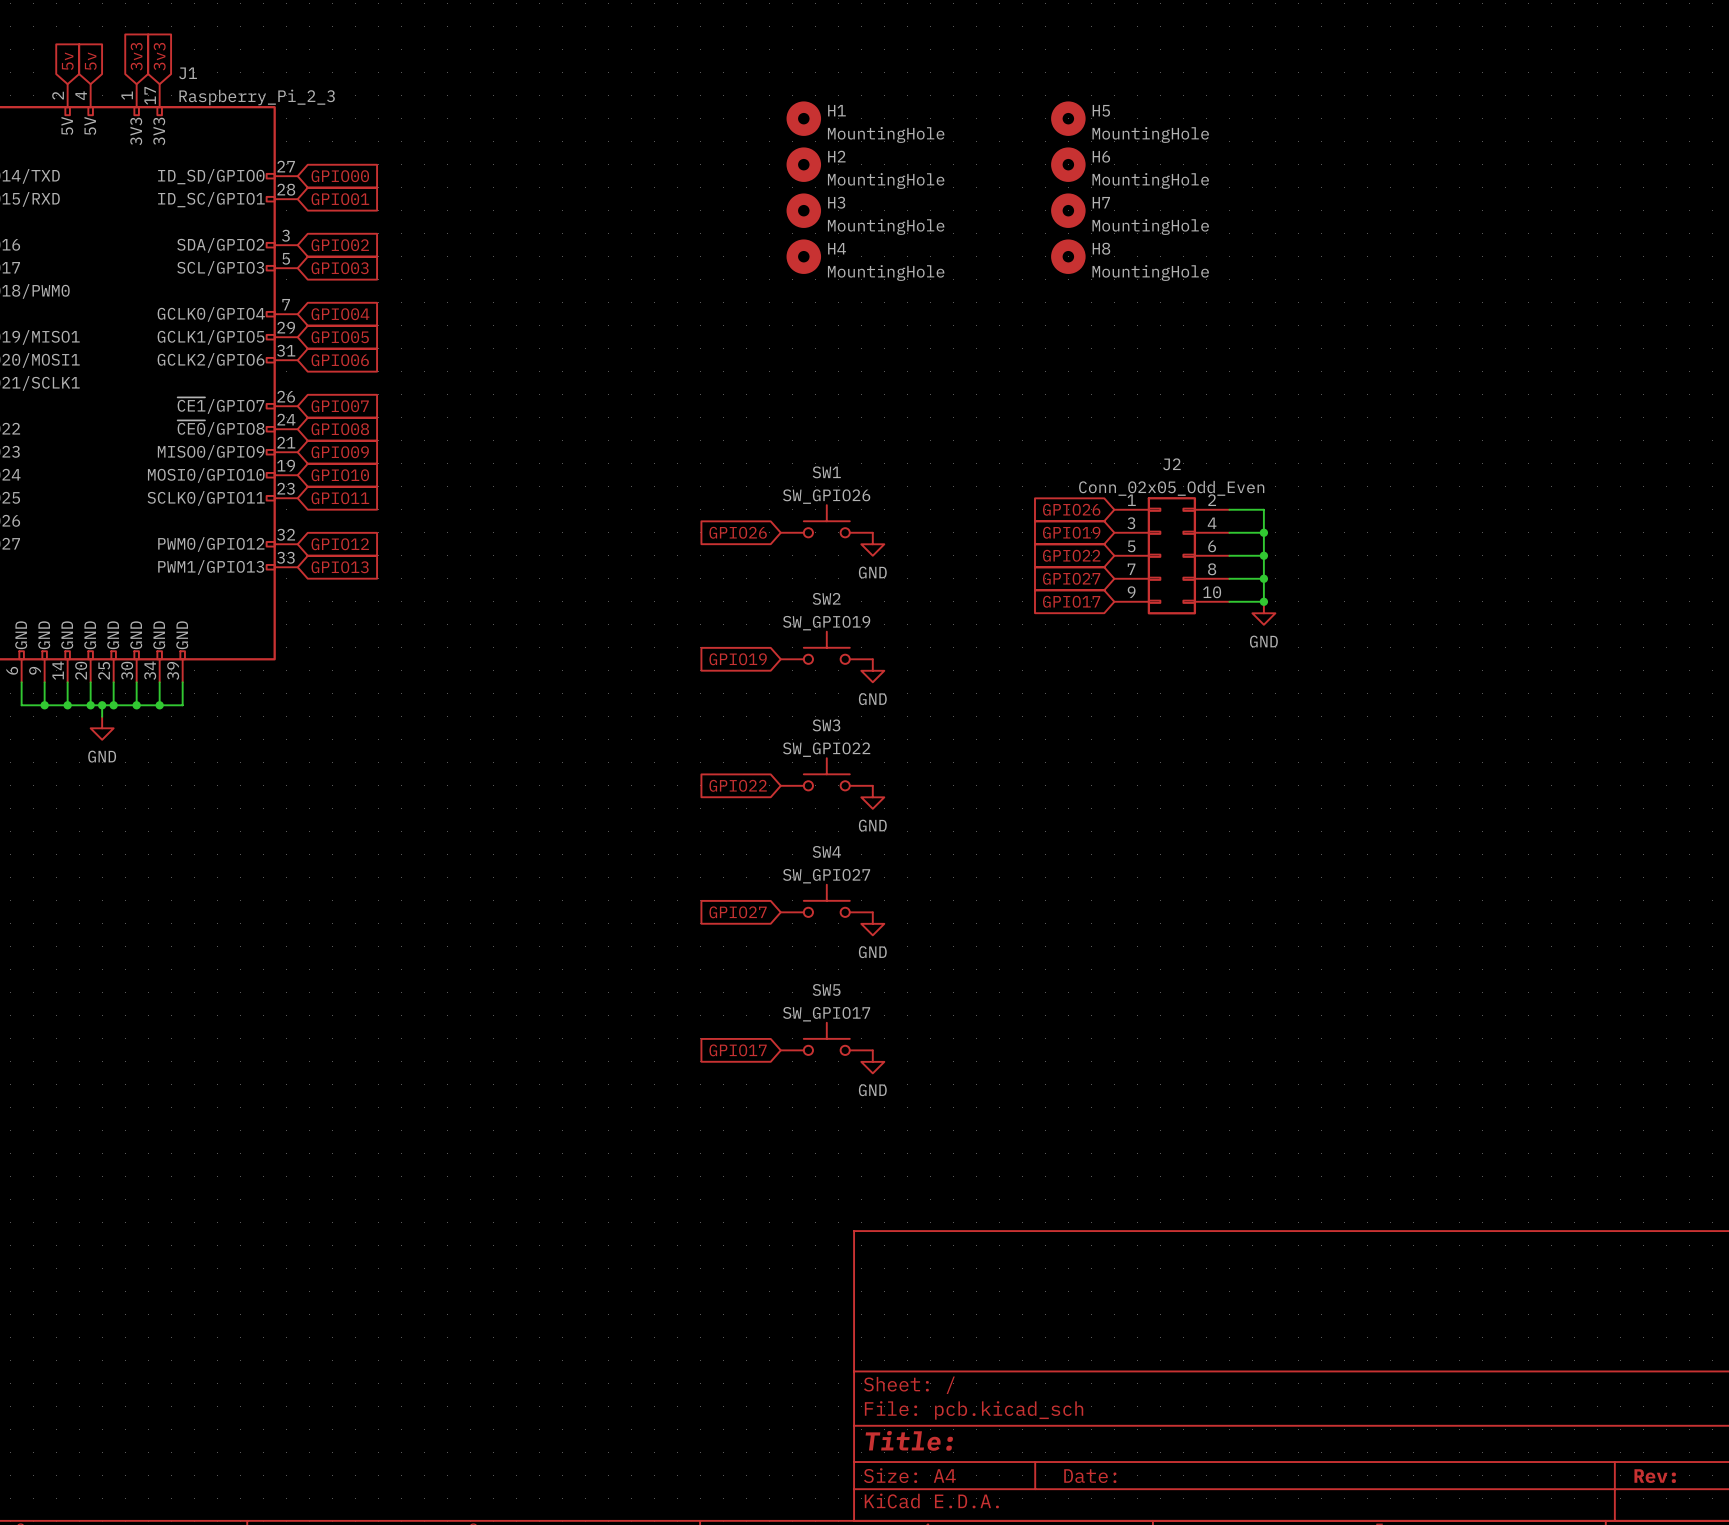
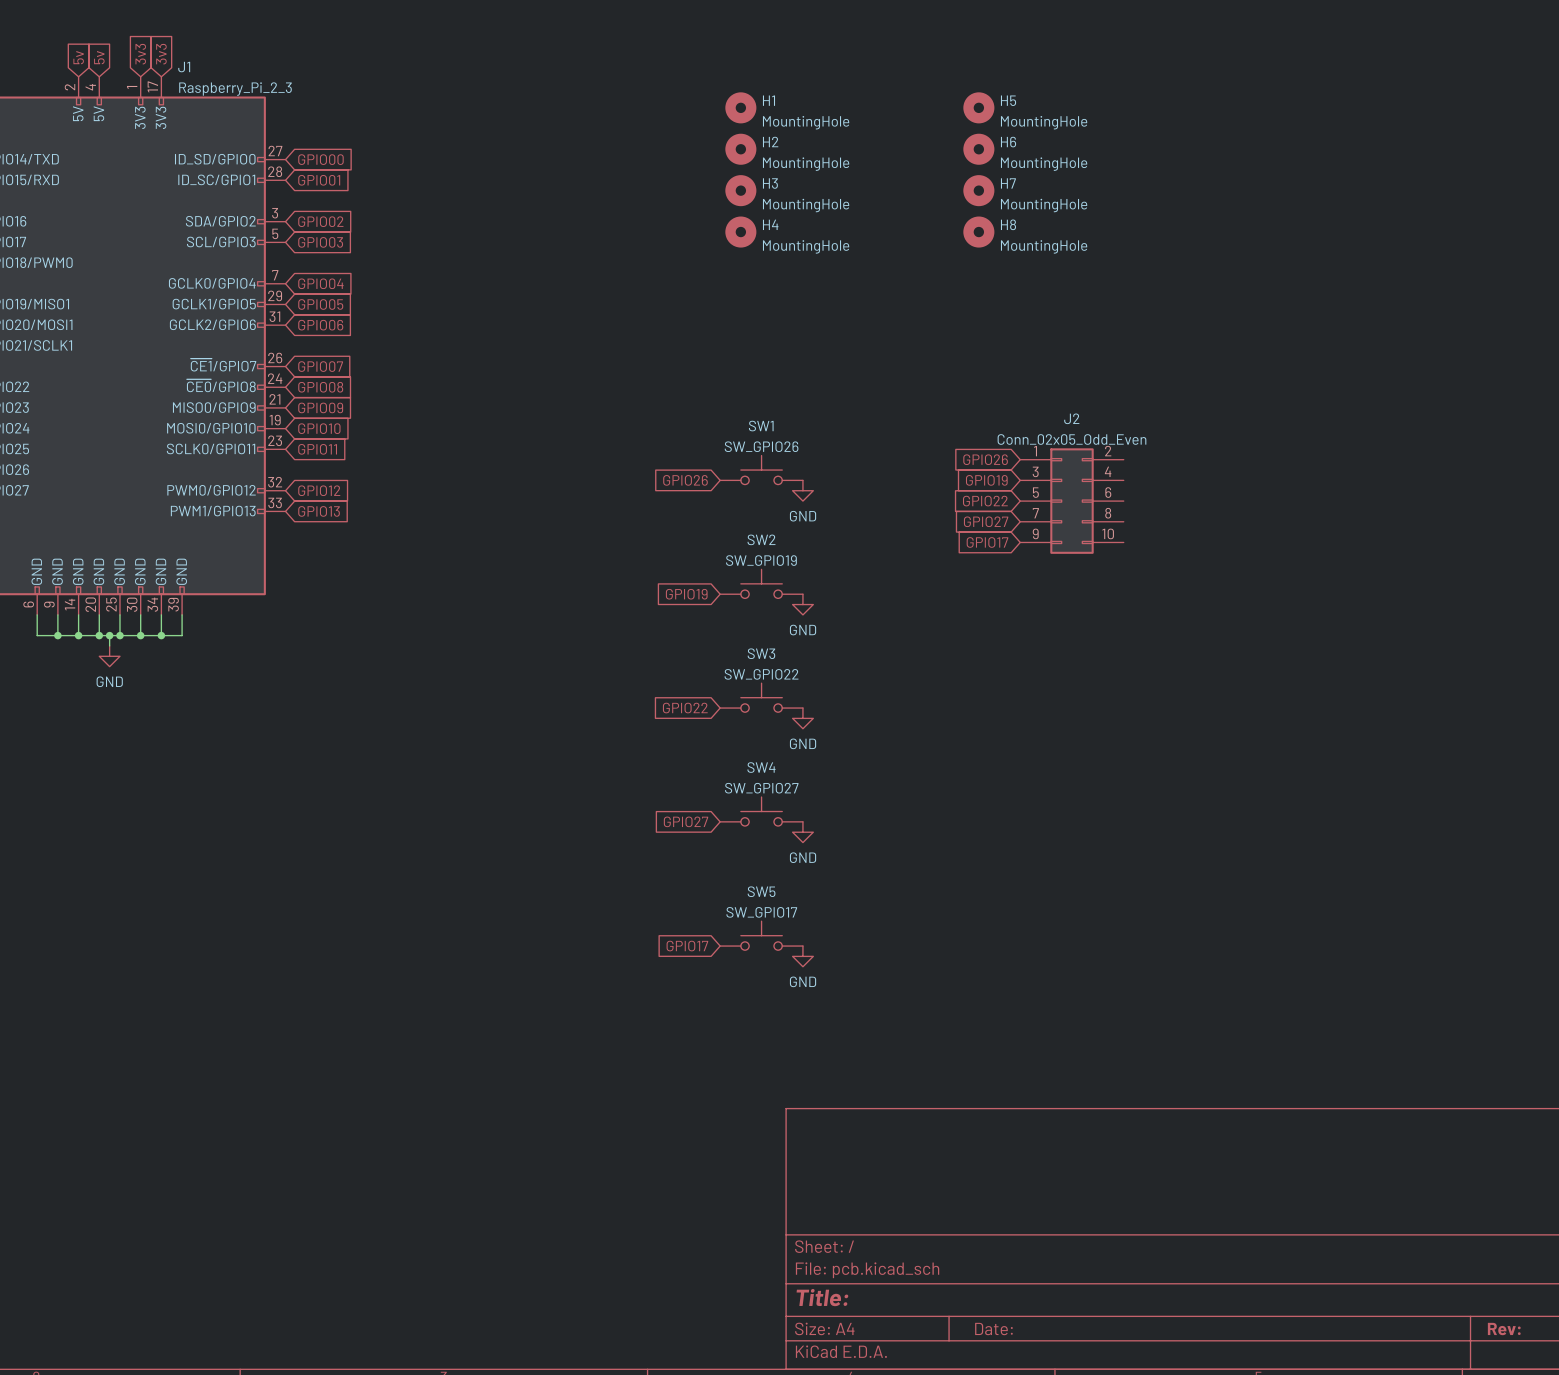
wire: (1229, 509) (1263, 509) (1263, 601) (1229, 601) -> none
wire: (1229, 532) (1263, 532) -> none
junction: (1263, 532) -> none
wire: (1229, 555) (1263, 555) -> none
junction: (1263, 555) -> none
wire: (1229, 578) (1263, 578) -> none
junction: (1263, 578) -> none
junction: (1263, 601) -> none
power symbol: GND (1263, 613) -> none

